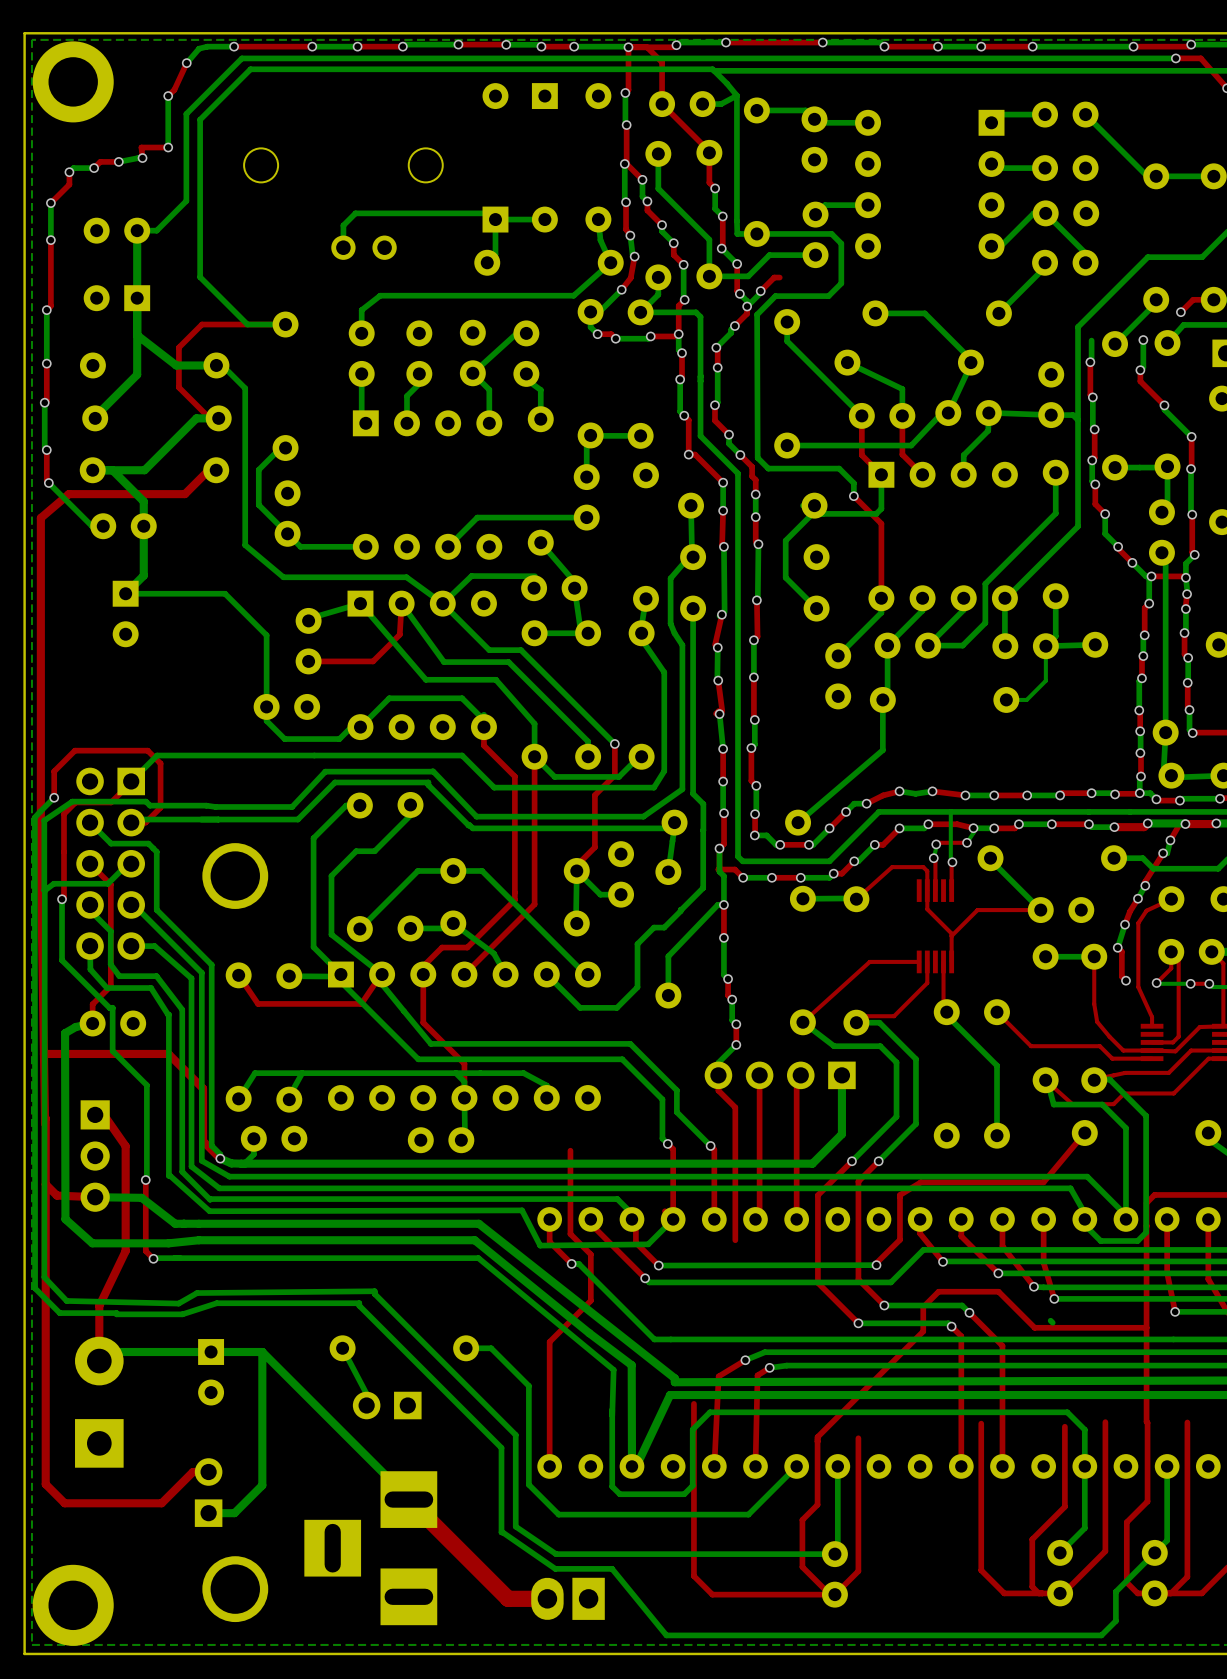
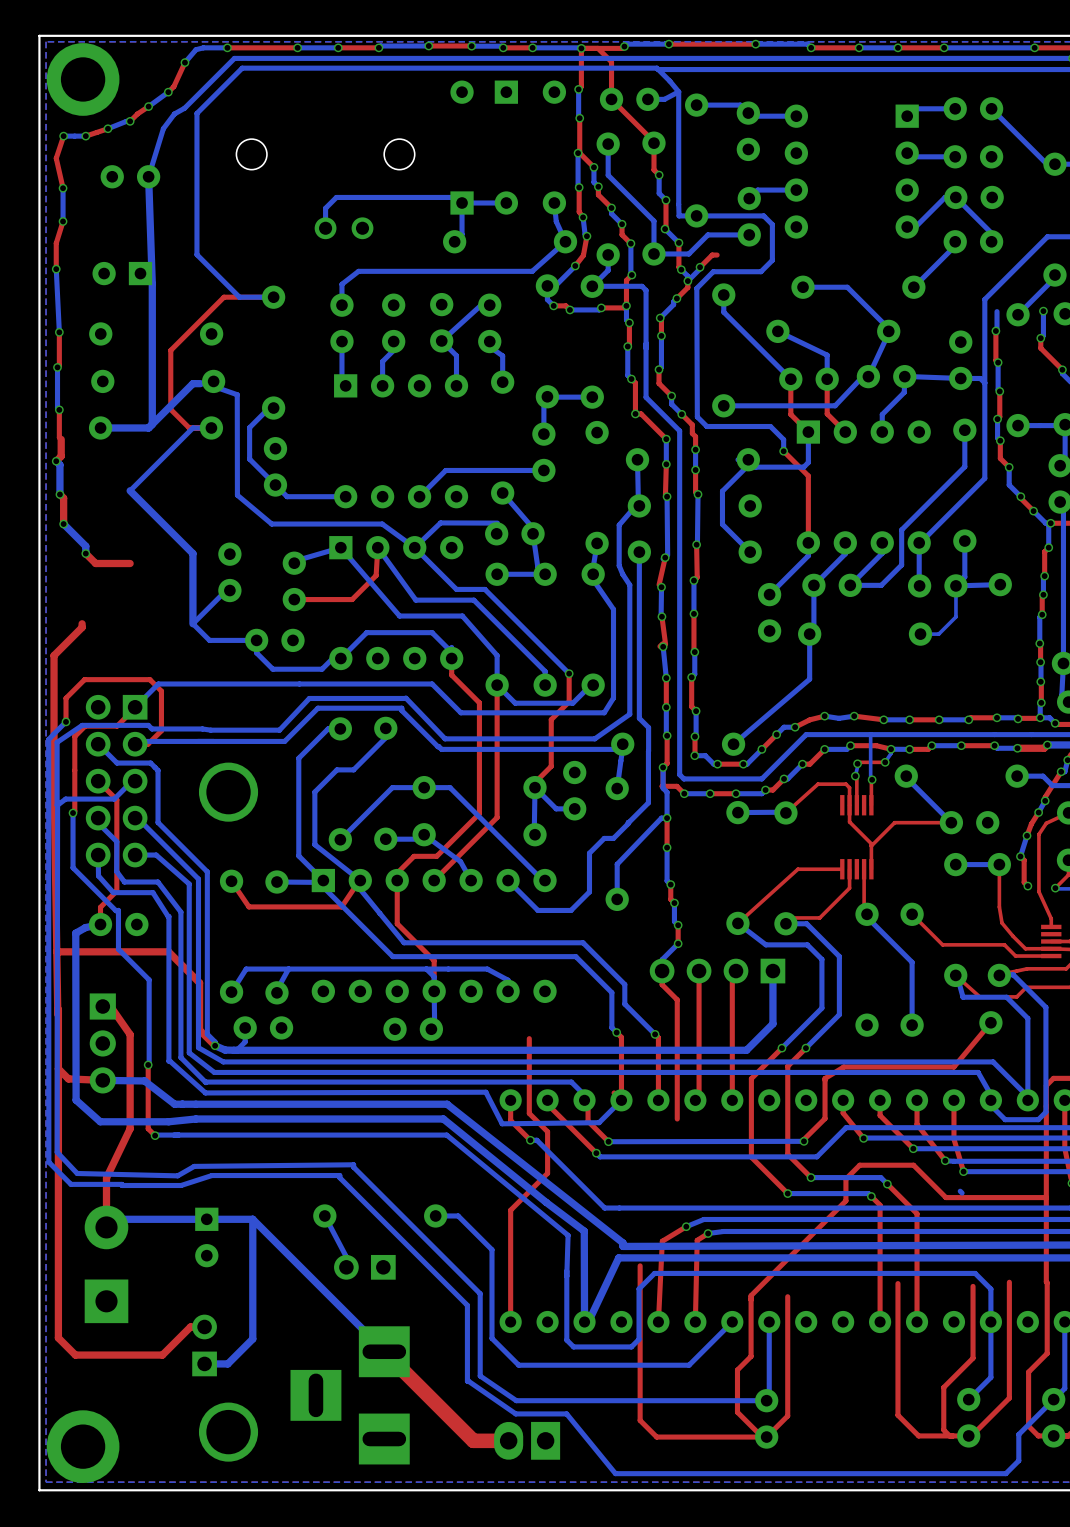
bottom track: (168, 96) (168, 147) -> (168, 92) (148, 106)
top track: none -> (148, 106) (130, 121)
via: none -> (148, 106)
bottom track: (186, 113) (186, 201) (156, 230) (137, 230) (137, 374) (95, 418) -> (184, 108) (174, 113) (163, 128) (148, 176) (152, 283) (152, 424)
bottom track: none -> (130, 121) (107, 128)
via: none -> (130, 121)
top track: none -> (107, 128) (85, 136)
via: none -> (107, 128)
via: none -> (63, 136)
bottom track: none -> (85, 136) (63, 136)
via: none -> (85, 136)
top track: (168, 147) (141, 147) (142, 158) -> none
via: (168, 147) -> none
bottom track: (142, 158) (118, 161) -> none
via: (142, 158) -> none
top track: (118, 161) (100, 161) (94, 168) -> none
via: (118, 161) -> none
bottom track: (94, 168) (73, 168) (69, 172) -> none
via: (94, 168) -> none
top track: (69, 172) (69, 184) (50, 203) -> (63, 136) (56, 158) (63, 188)
via: (69, 172) -> none
part position: (116, 230) -> (130, 176)
top track: (50, 240) (50, 305) (46, 310) -> (63, 221) (56, 243) (56, 269)
bottom track: (46, 310) (46, 363) -> (56, 269) (59, 332)
via position: (46, 310) -> (56, 269)
top track: (230, 324) (201, 324) (178, 347) (178, 387) (209, 418) (218, 418) -> (223, 297) (170, 350) (170, 409) (189, 427) (200, 427)
bottom track: (137, 335) (176, 365) (222, 365) (245, 388) (245, 545) -> none
bottom track: (218, 418) (196, 418) (144, 470) -> (237, 495) (237, 394) (205, 383) (192, 383) (147, 427)
bottom track: (112, 470) (143, 501) (143, 575) (125, 593) (225, 593) (266, 635) (266, 706) -> (192, 623) (209, 640) (256, 640)
bottom track: none -> (200, 427) (192, 427) (130, 490) (192, 553) (192, 623)
top track: (216, 470) (208, 470) (184, 494) (68, 494) (40, 517) (40, 723) -> (82, 623) (82, 627) (54, 655)
bottom track: (48, 483) (92, 526) (103, 526) -> none
top track: none -> (61, 439) (61, 456) (56, 461)
via position: (48, 483) -> (56, 461)
bottom track: none -> (56, 461) (59, 464) (59, 494)
part rotation: 0° (123, 526) -> 90° clockwise (229, 572)
part position: (123, 526) -> (229, 572)
top track: none -> (59, 494) (63, 498) (63, 524)
via: none -> (59, 494)
bottom track: none -> (63, 524) (85, 546) (85, 553)
via: none -> (63, 524)
top track: none -> (85, 553) (95, 563) (130, 563)
via: none -> (85, 553)
part: (125, 614) -> none
bottom track: none -> (229, 590) (226, 590) (192, 623)

